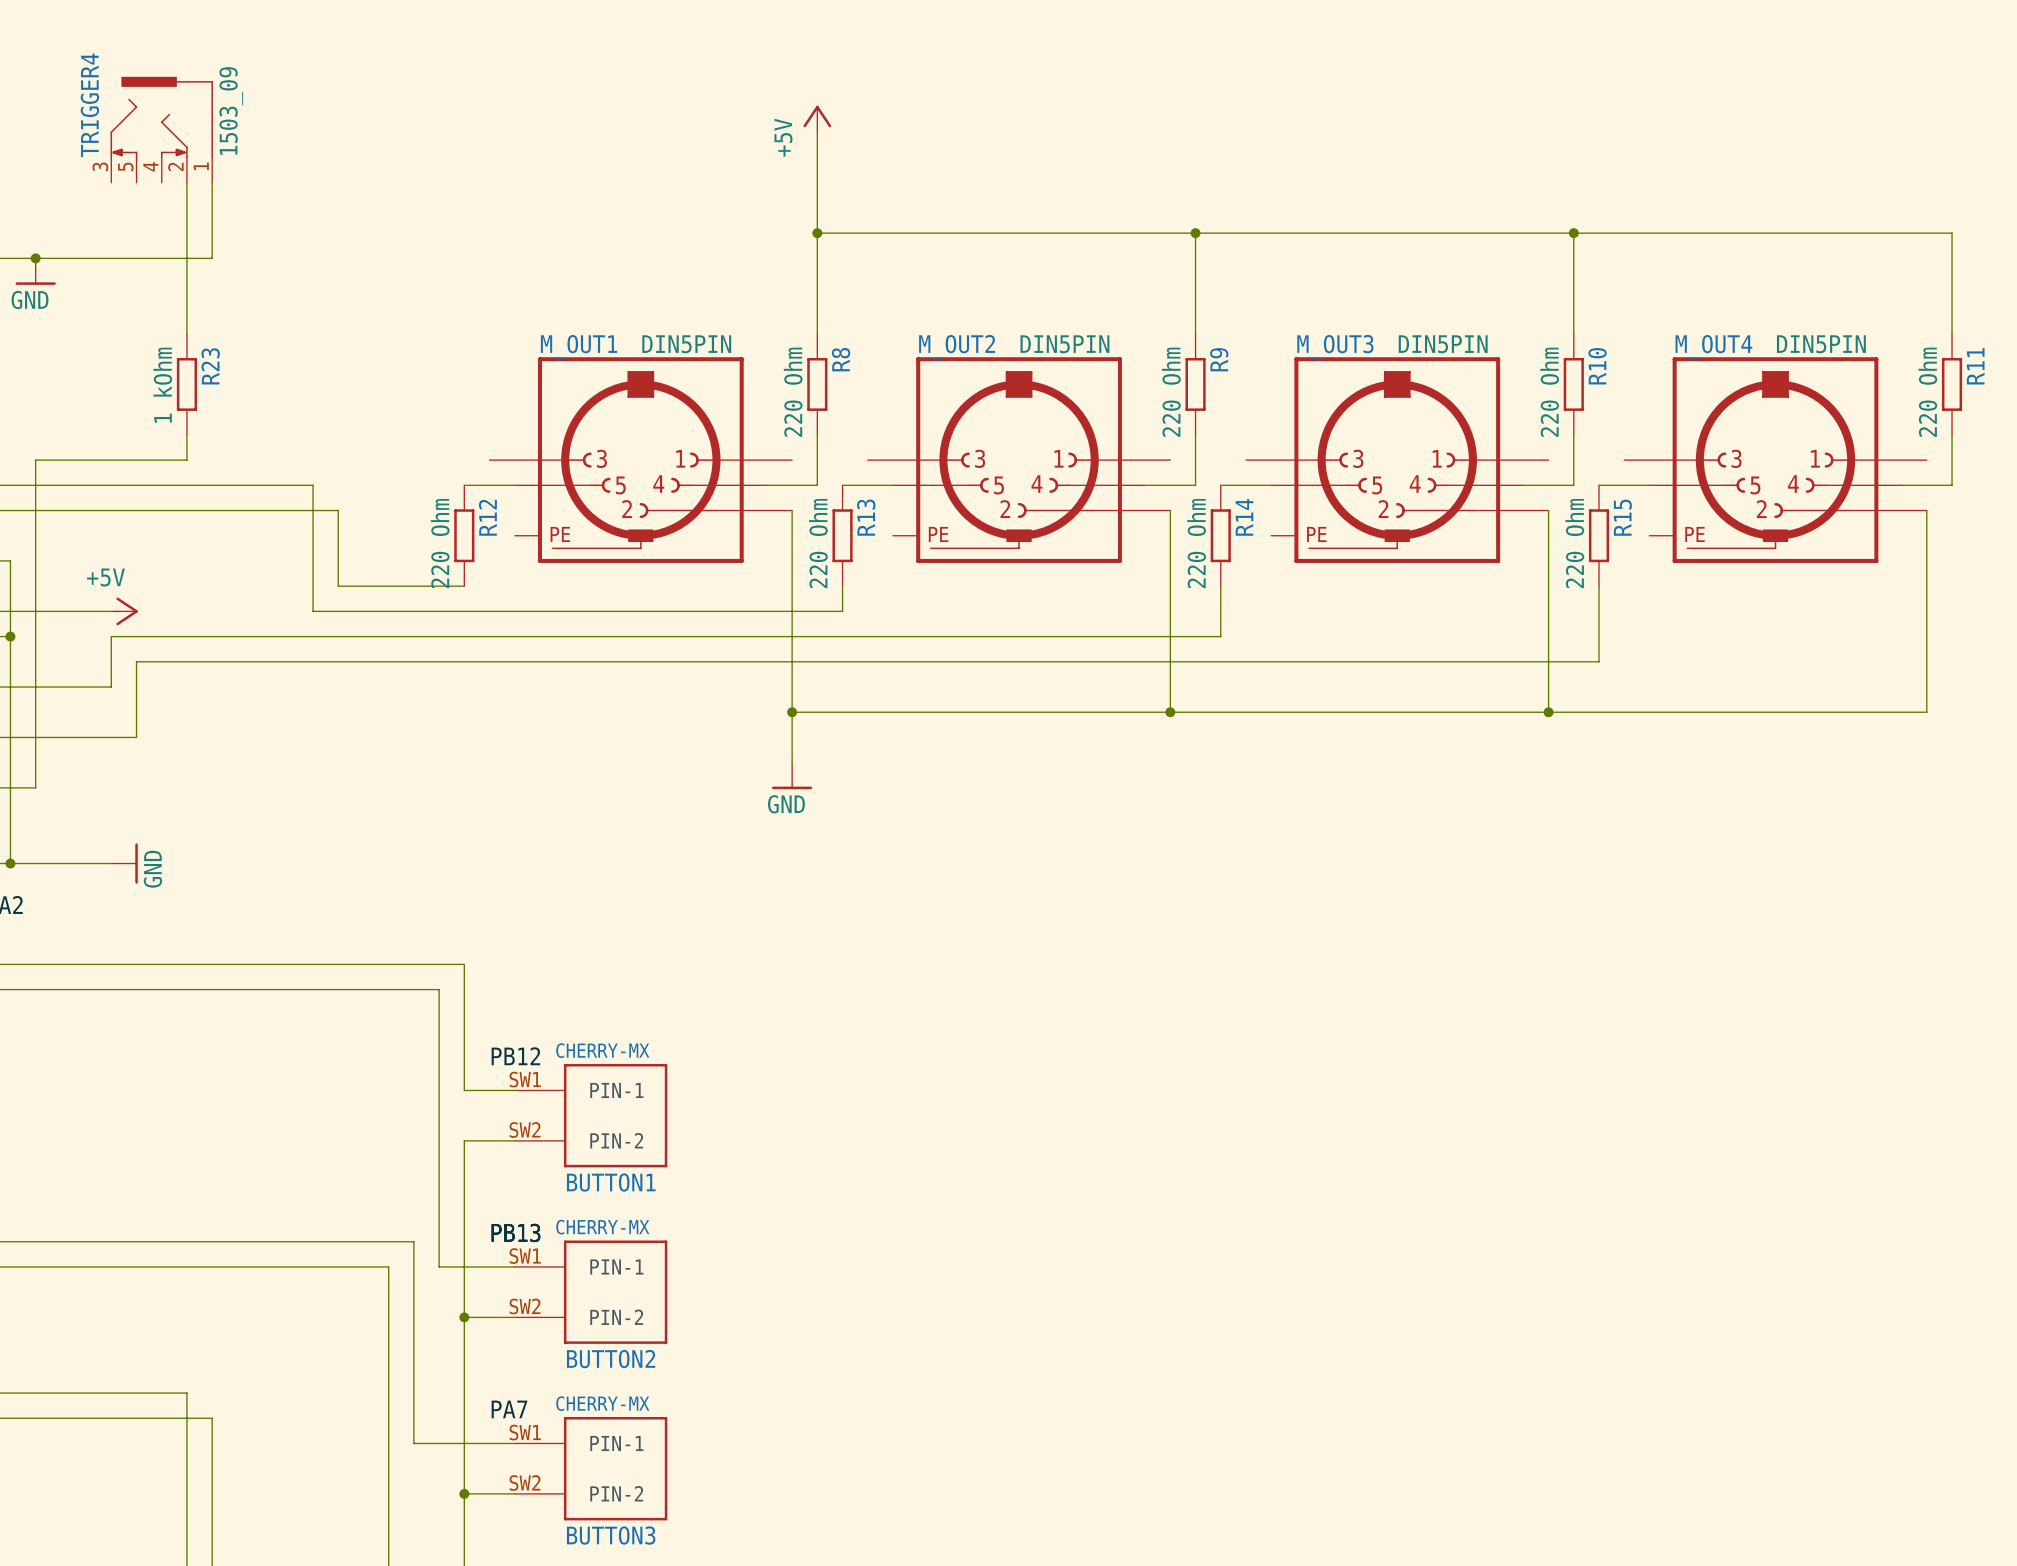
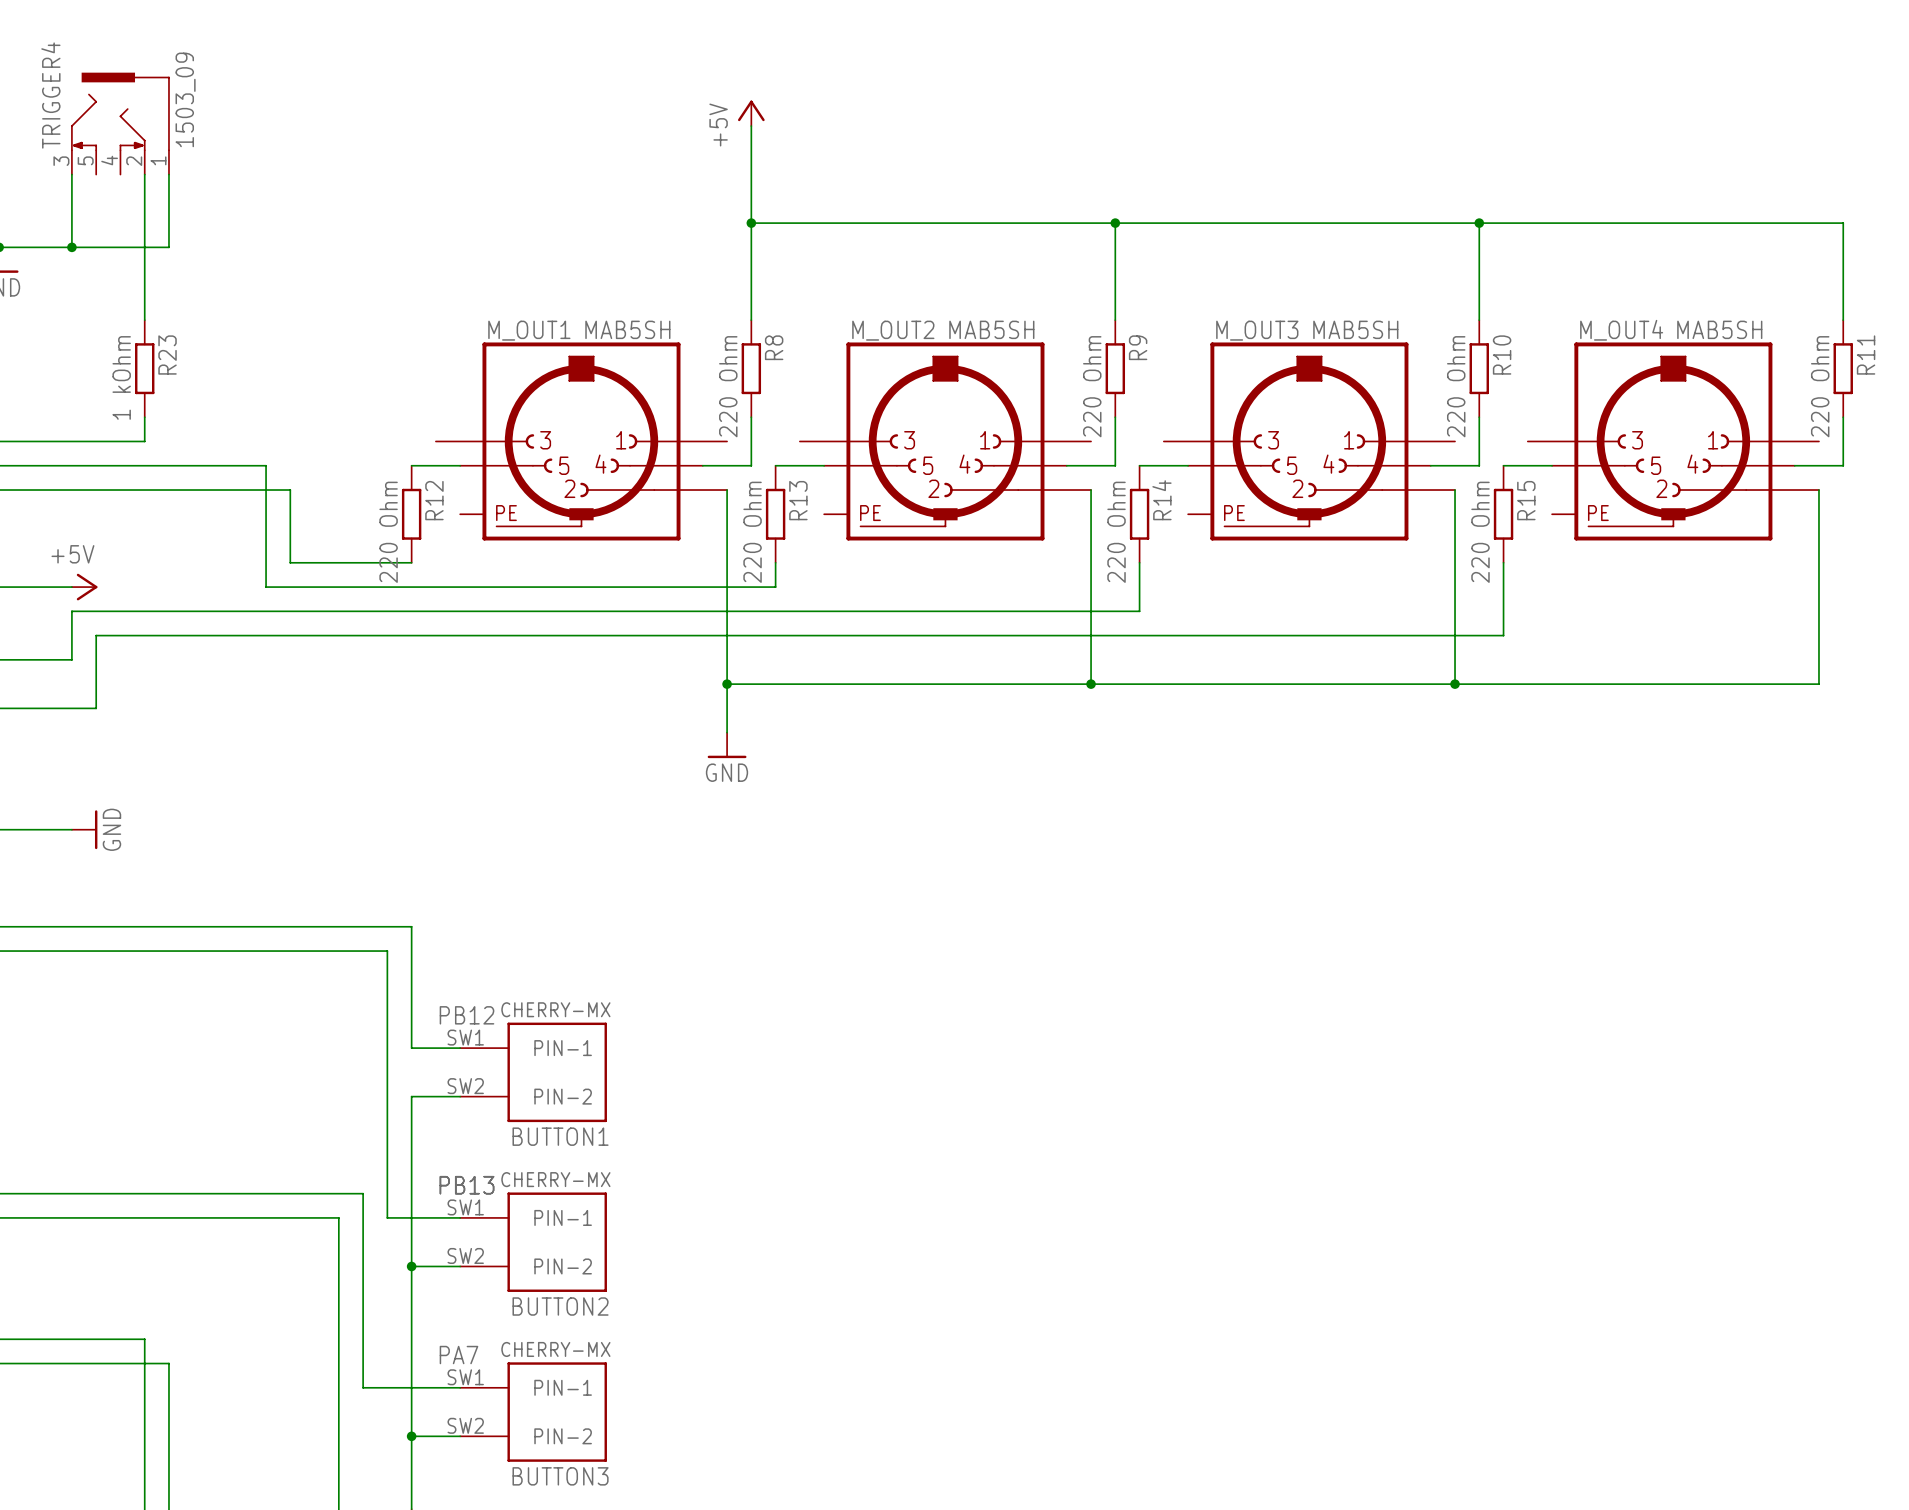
wire: none -> (71, 174) (71, 247)
junction: none -> (71, 247)
M_OUT1 value: DIN5PIN (686, 344) -> MAB5SH (627, 329)
M_OUT2 value: DIN5PIN (1064, 344) -> MAB5SH (991, 329)
M_OUT3 value: DIN5PIN (1443, 344) -> MAB5SH (1355, 329)
M_OUT4 value: DIN5PIN (1821, 344) -> MAB5SH (1719, 329)

